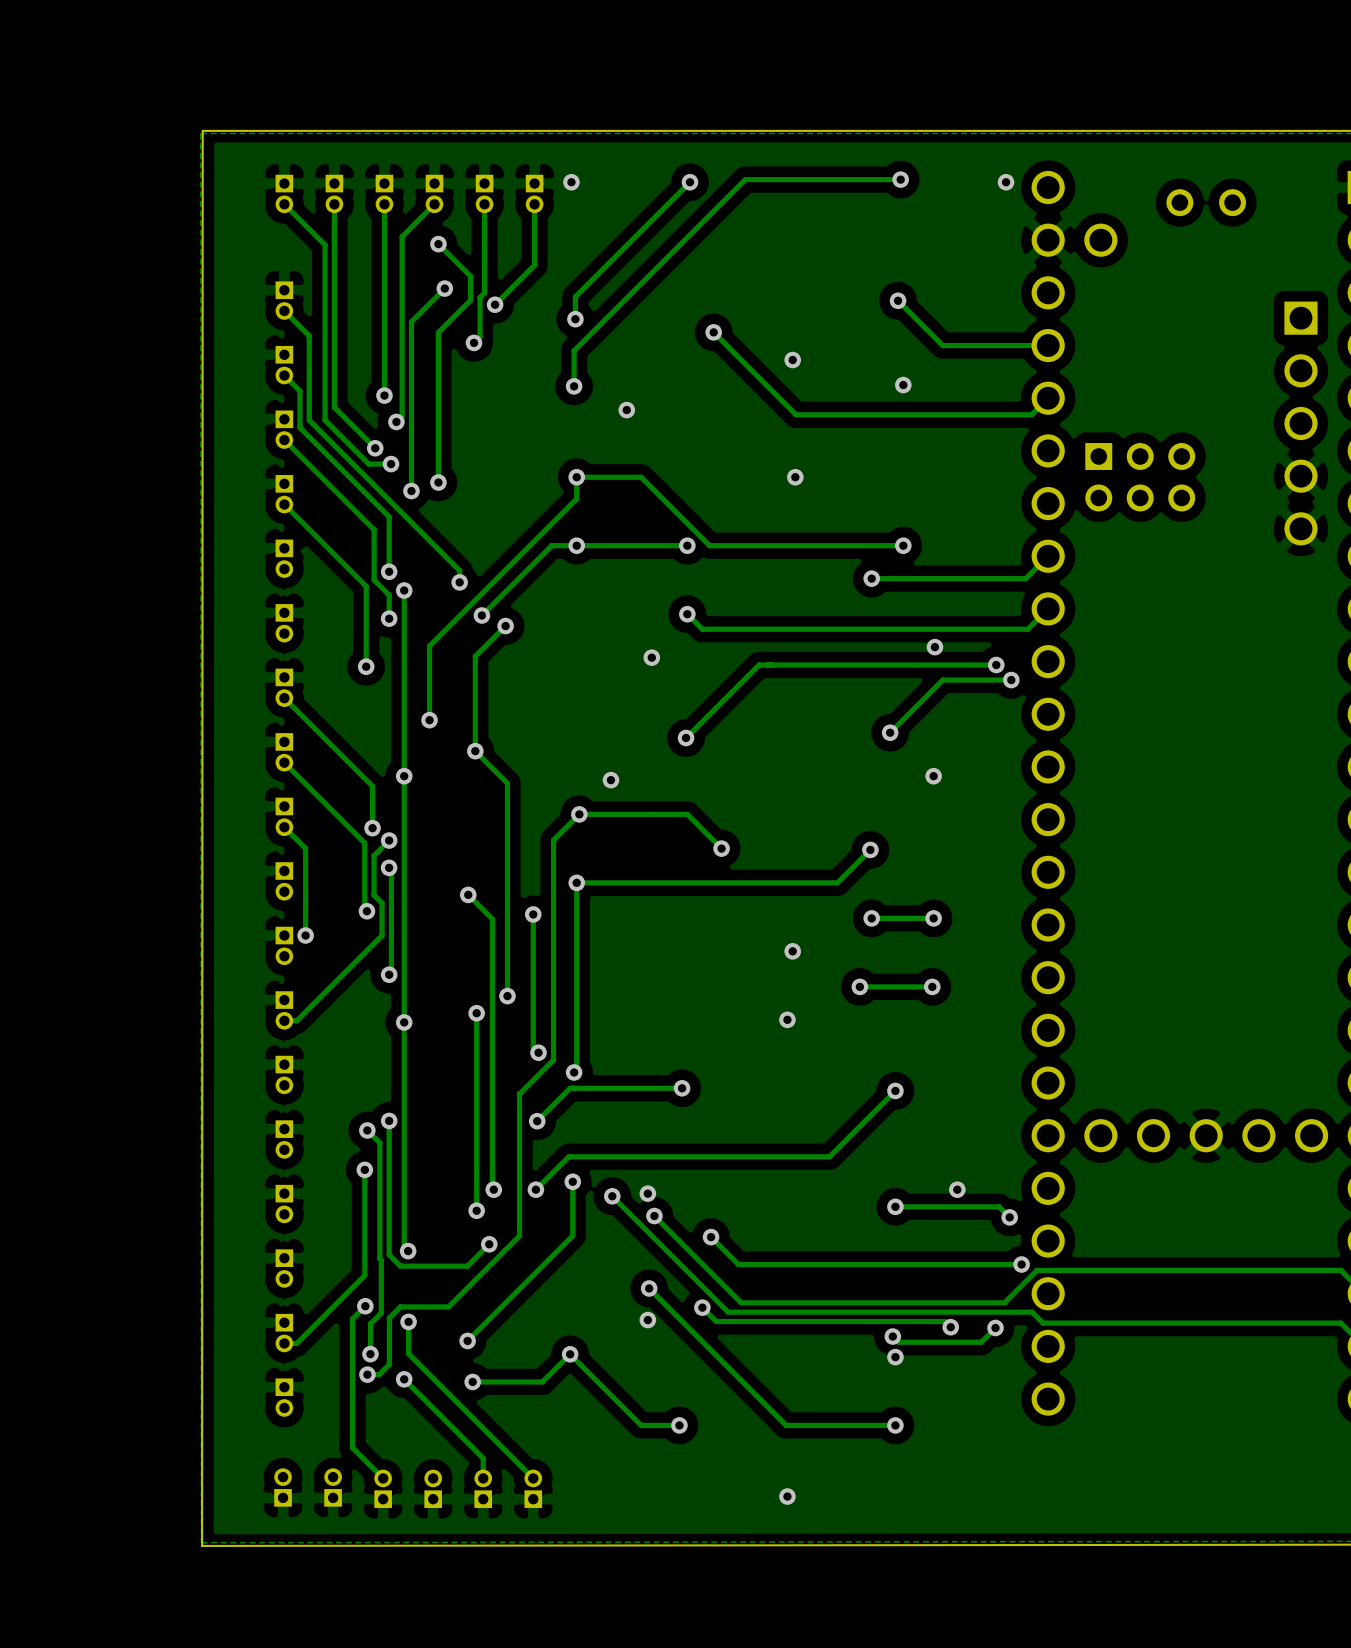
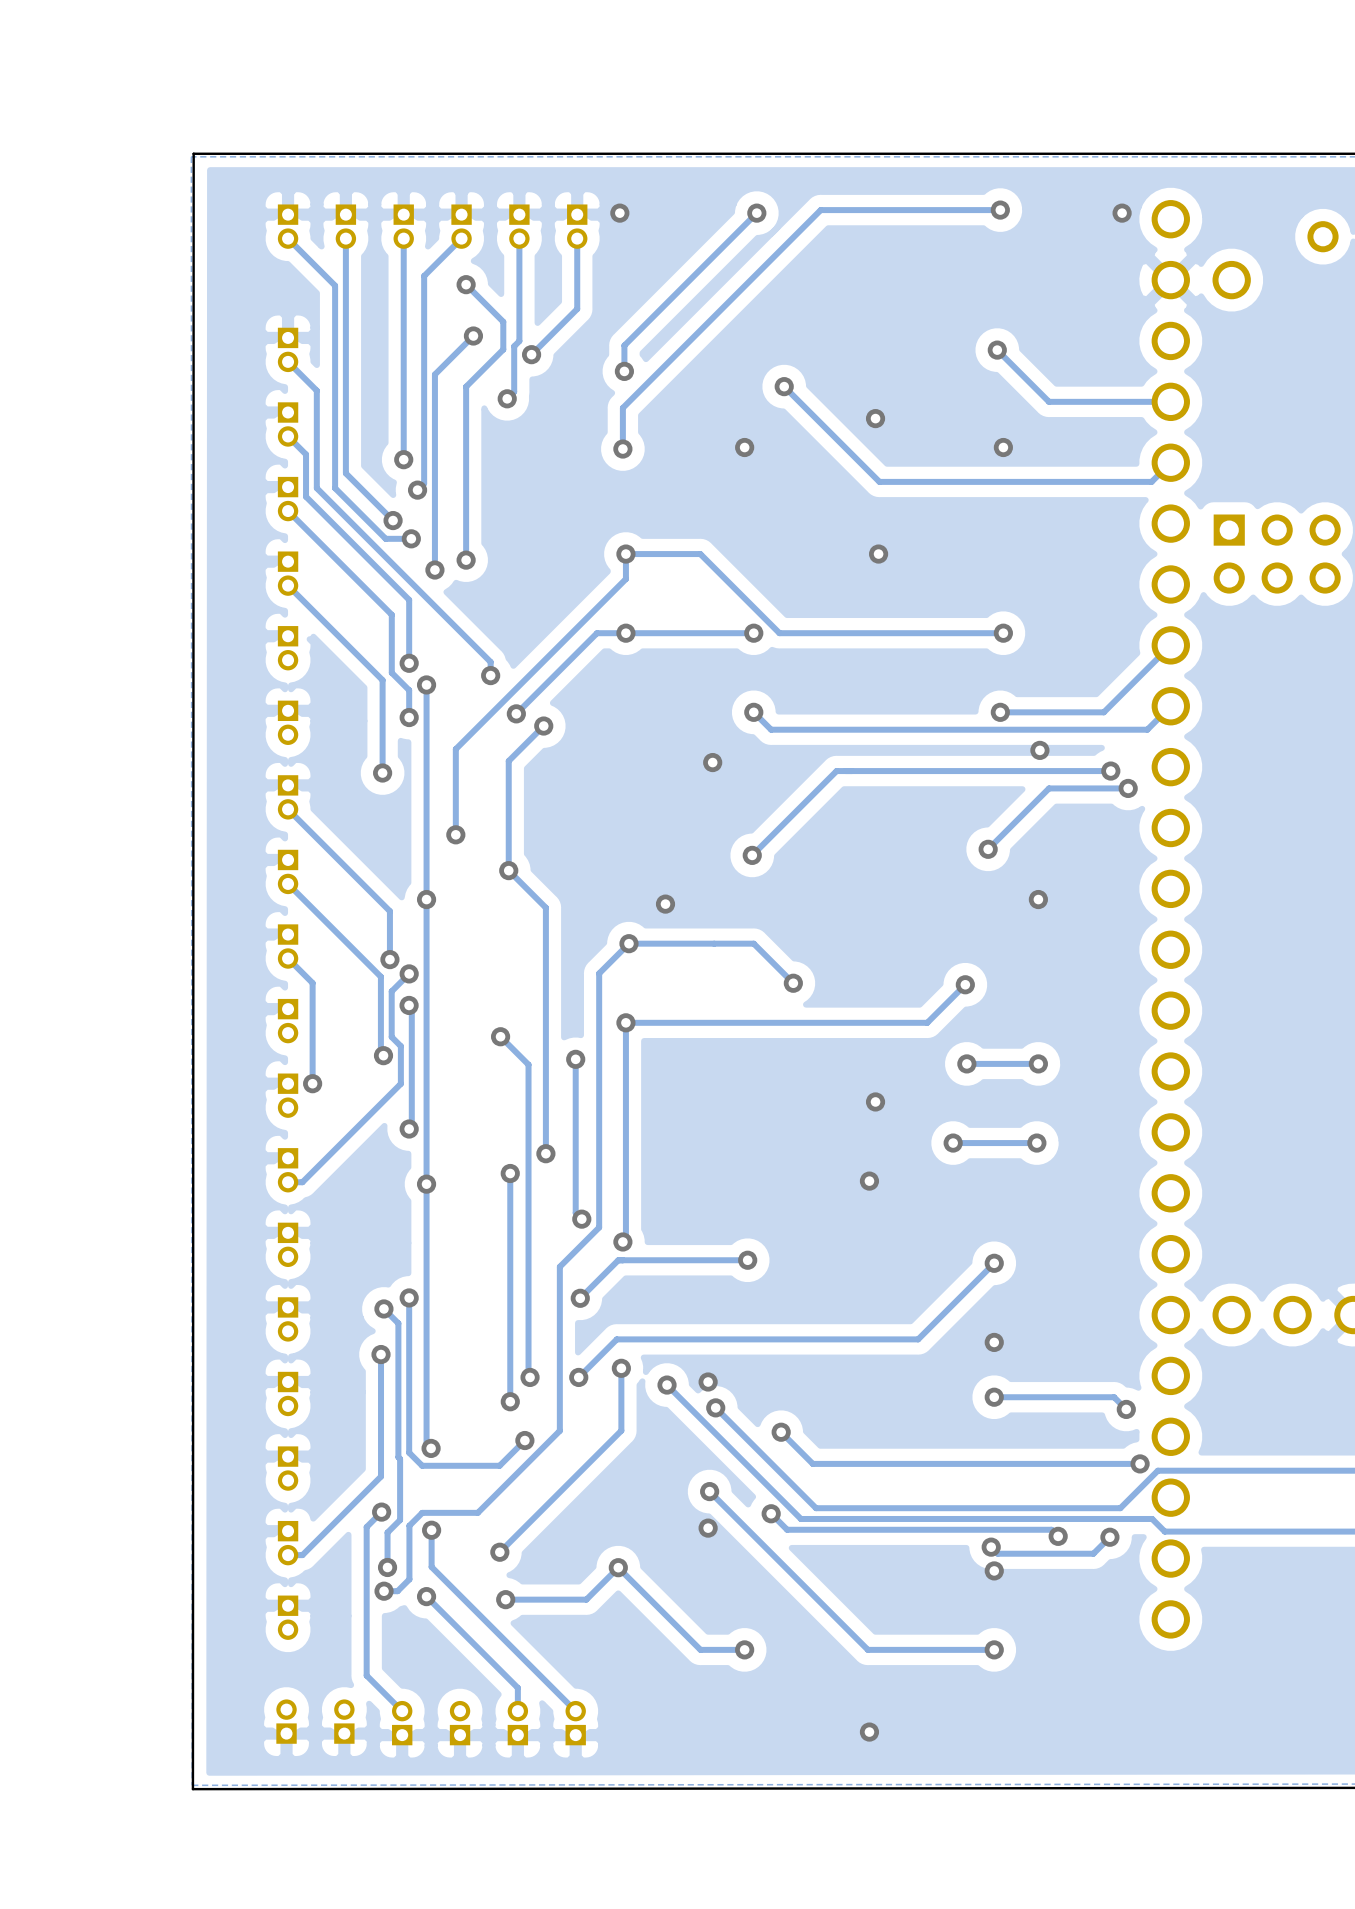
via position: (626, 410) -> (744, 447)
via position: (871, 578) -> (1000, 712)
track: (1025, 578) (871, 578) -> (1144, 671) (1103, 712) (1000, 712)
via position: (957, 1189) -> (994, 1342)

